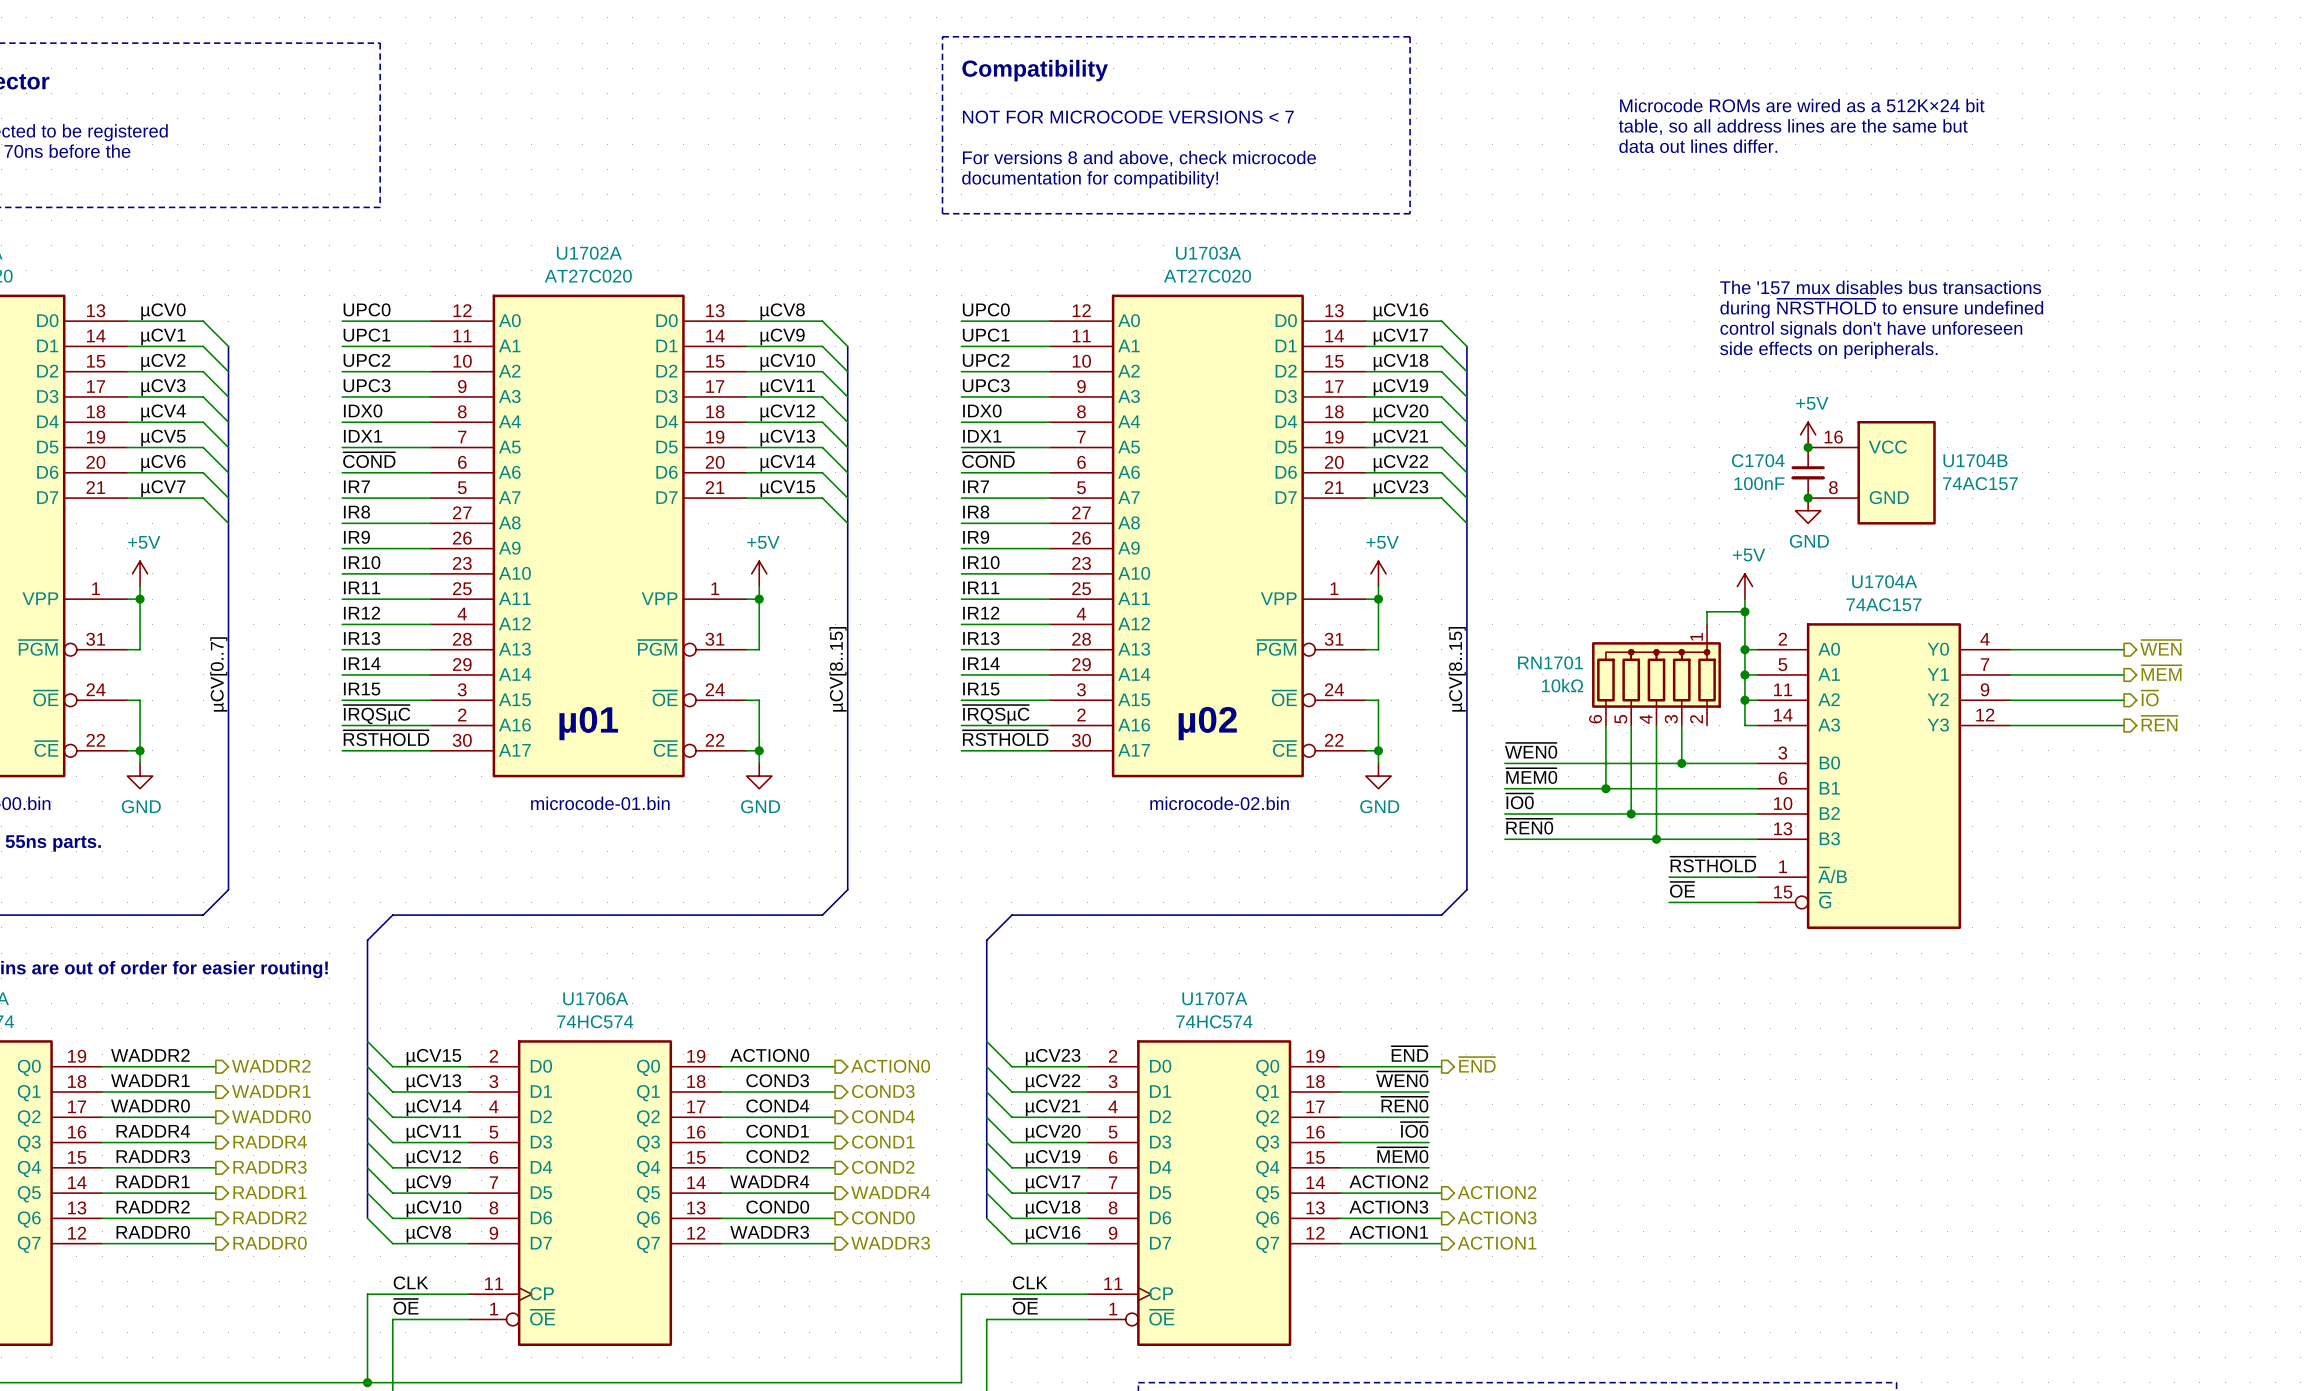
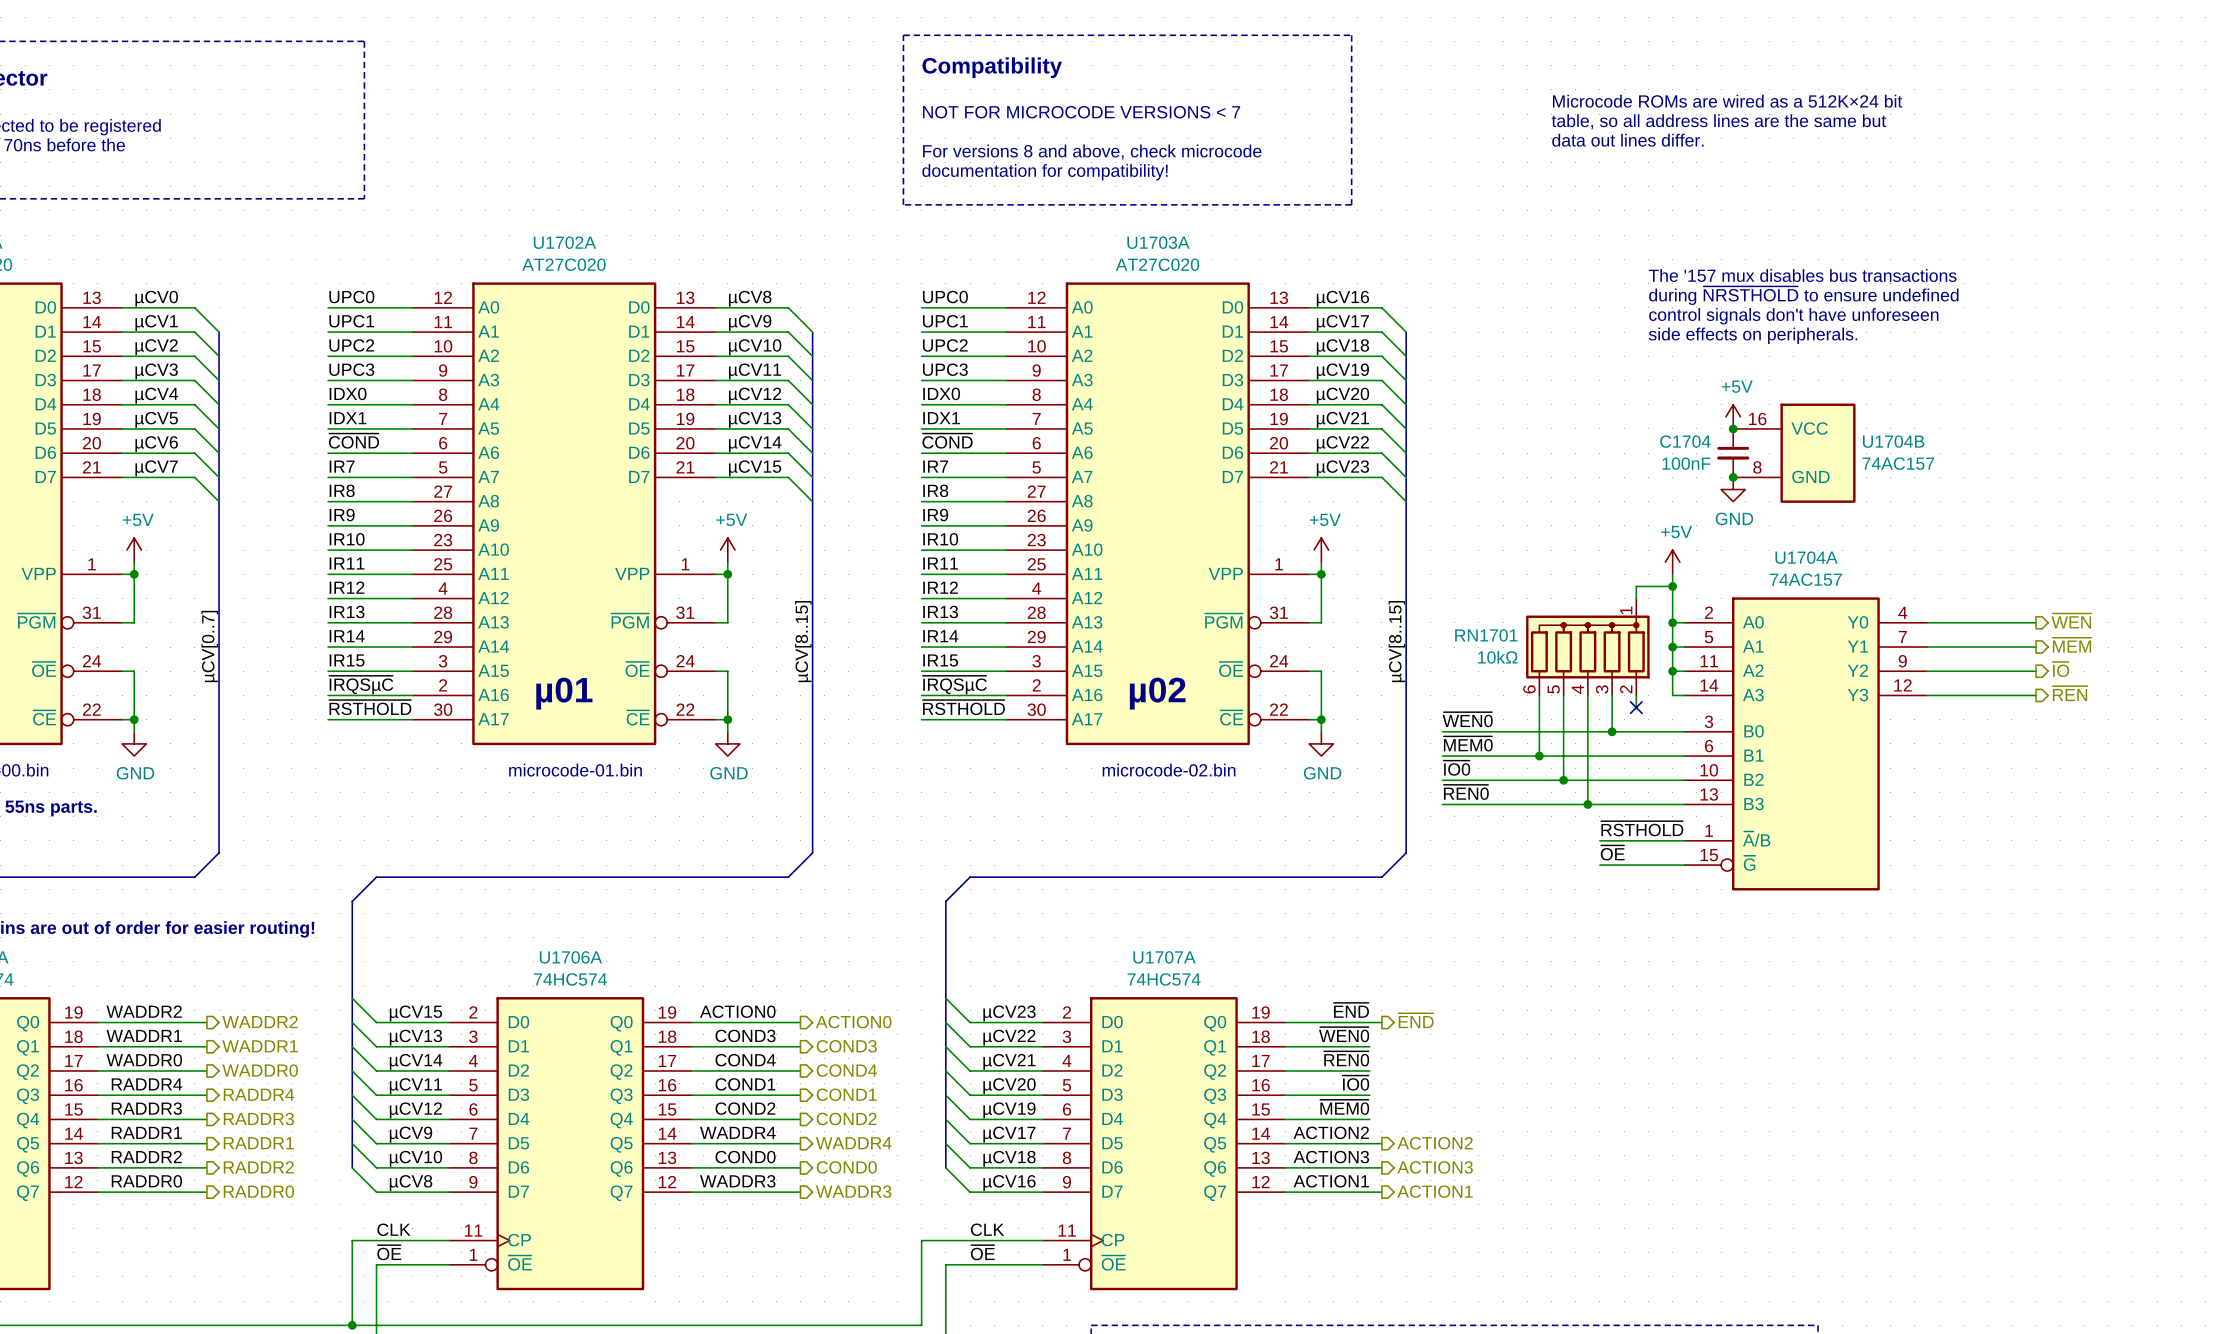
wire: none -> (1636, 695) (1636, 707)
no-connect mark: none -> (1636, 707)

